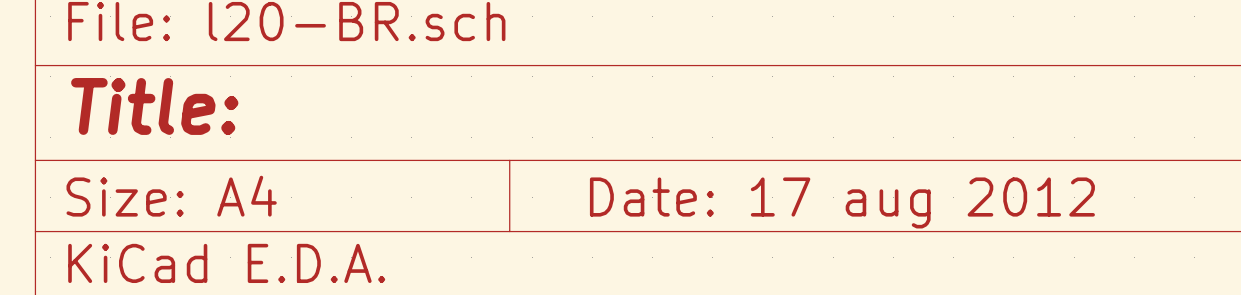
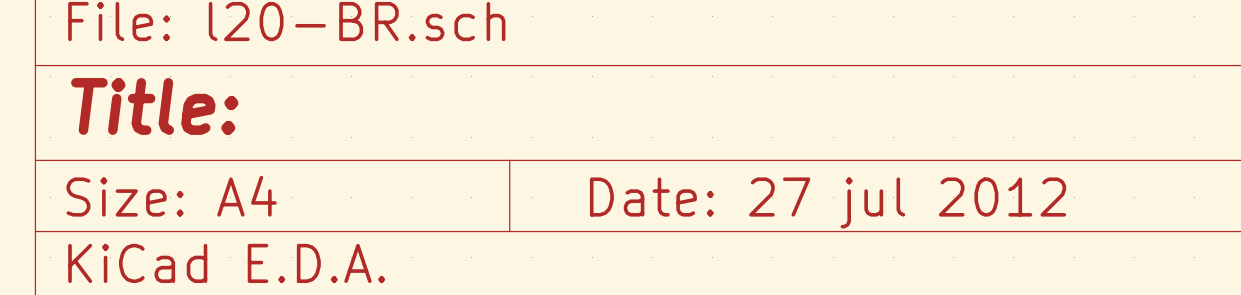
title block: Date: 17 aug 2012 (842, 202) -> Date: 27 jul 2012 (828, 202)

